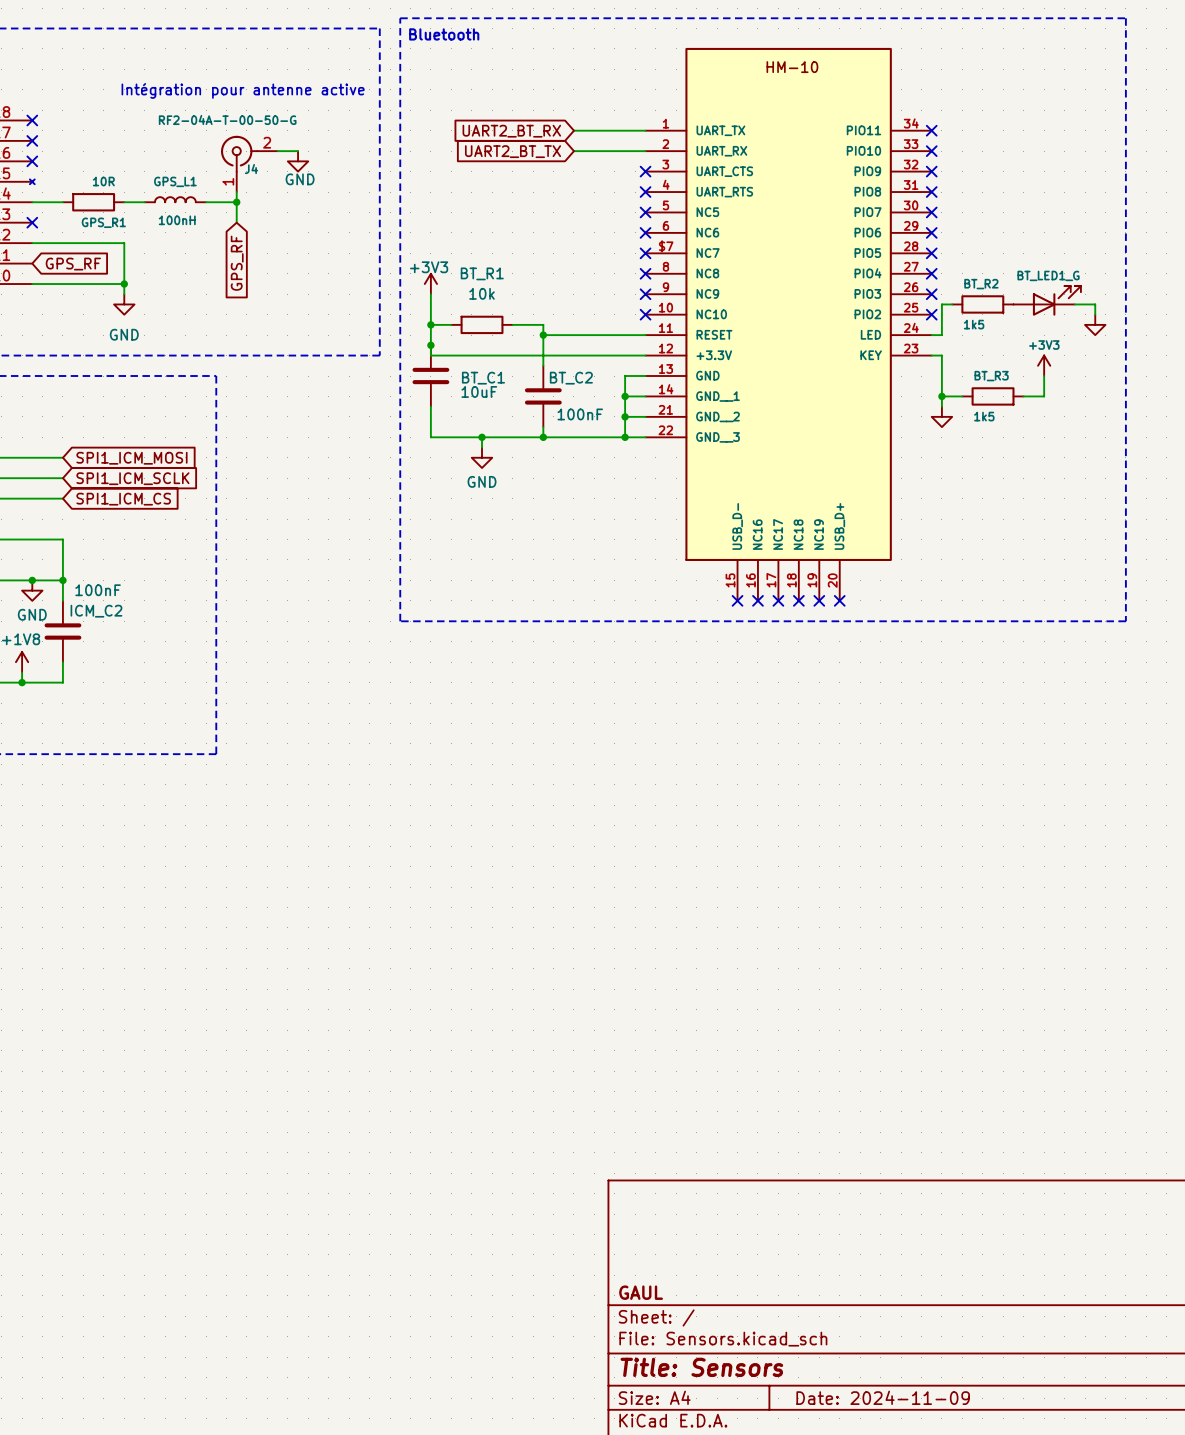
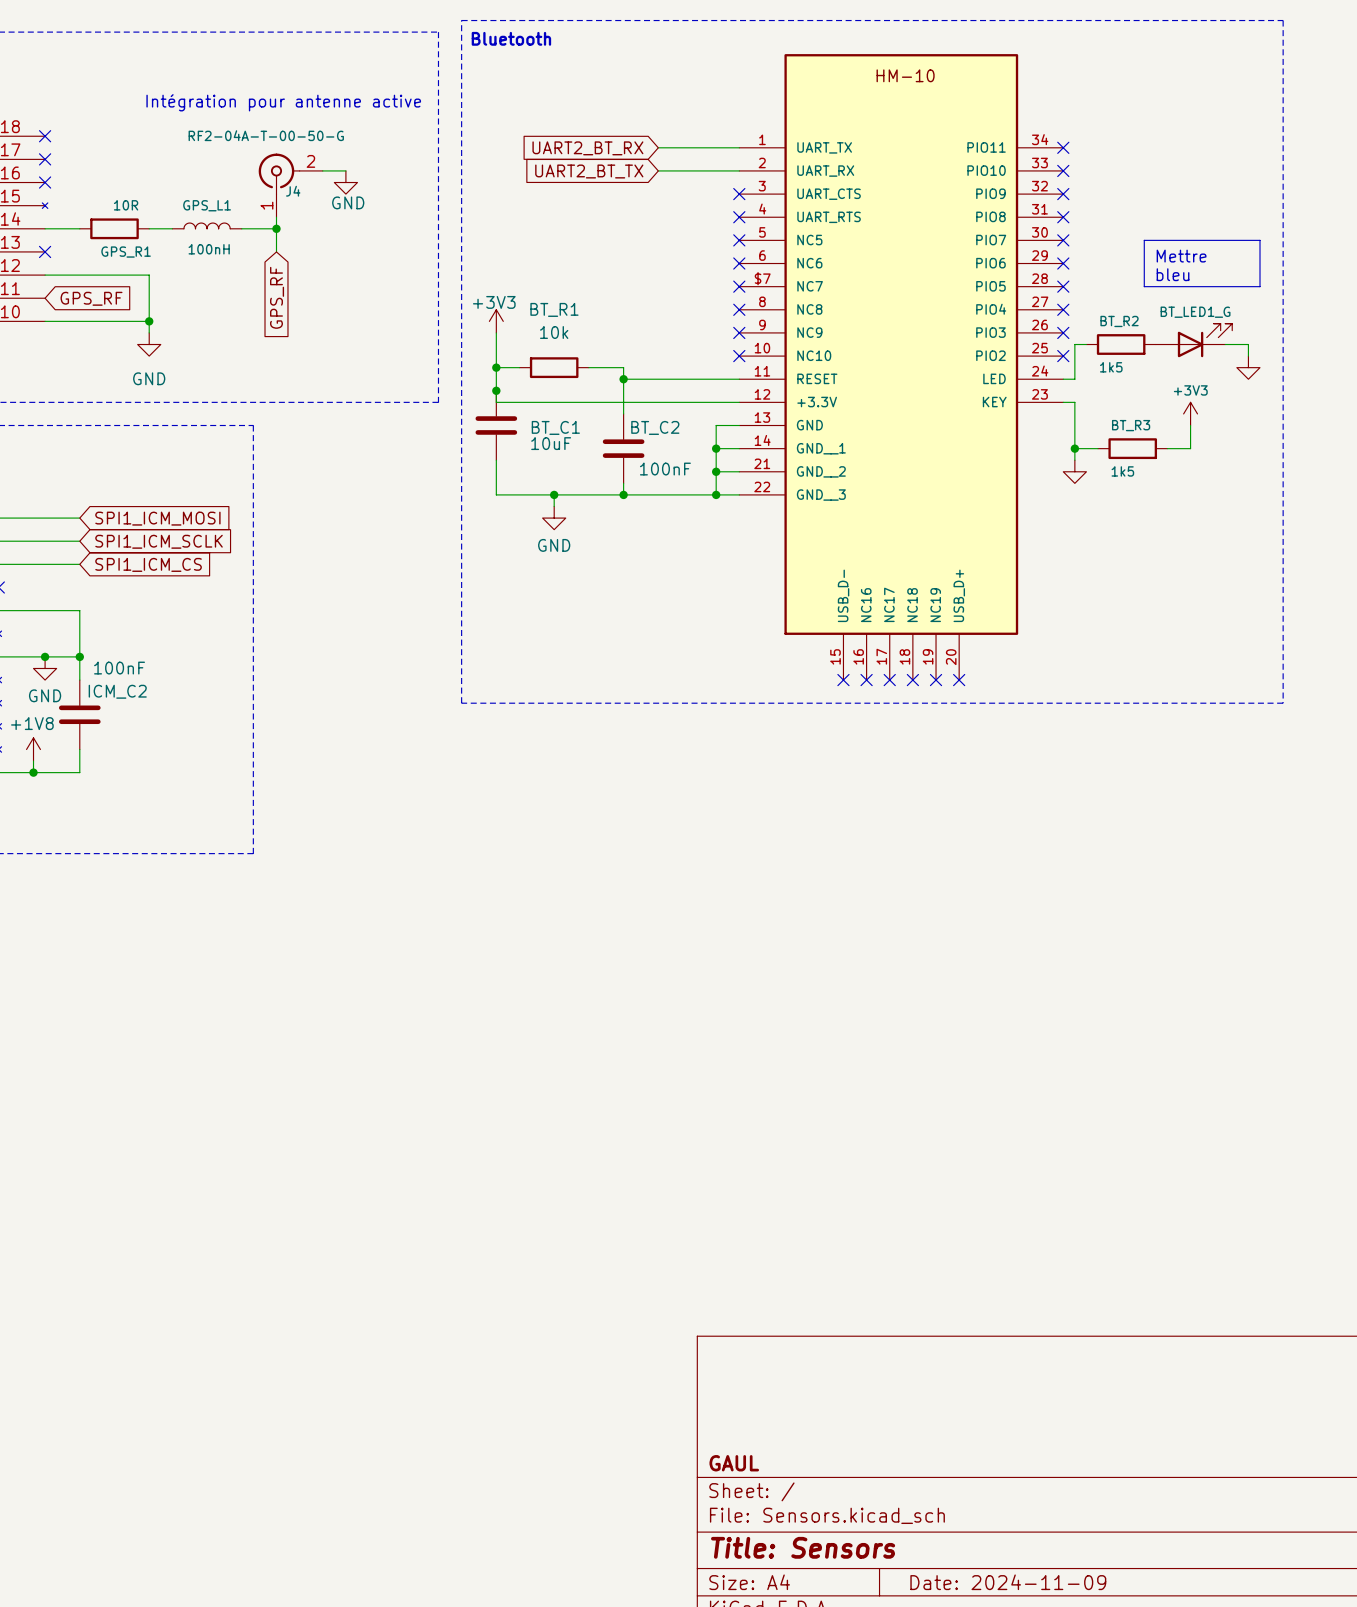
line: none -> (1144, 240) (1260, 240) (1260, 286) (1144, 286) (1144, 240)
text: none -> Mettre (1181, 256)
text: none -> bleu (1173, 274)

